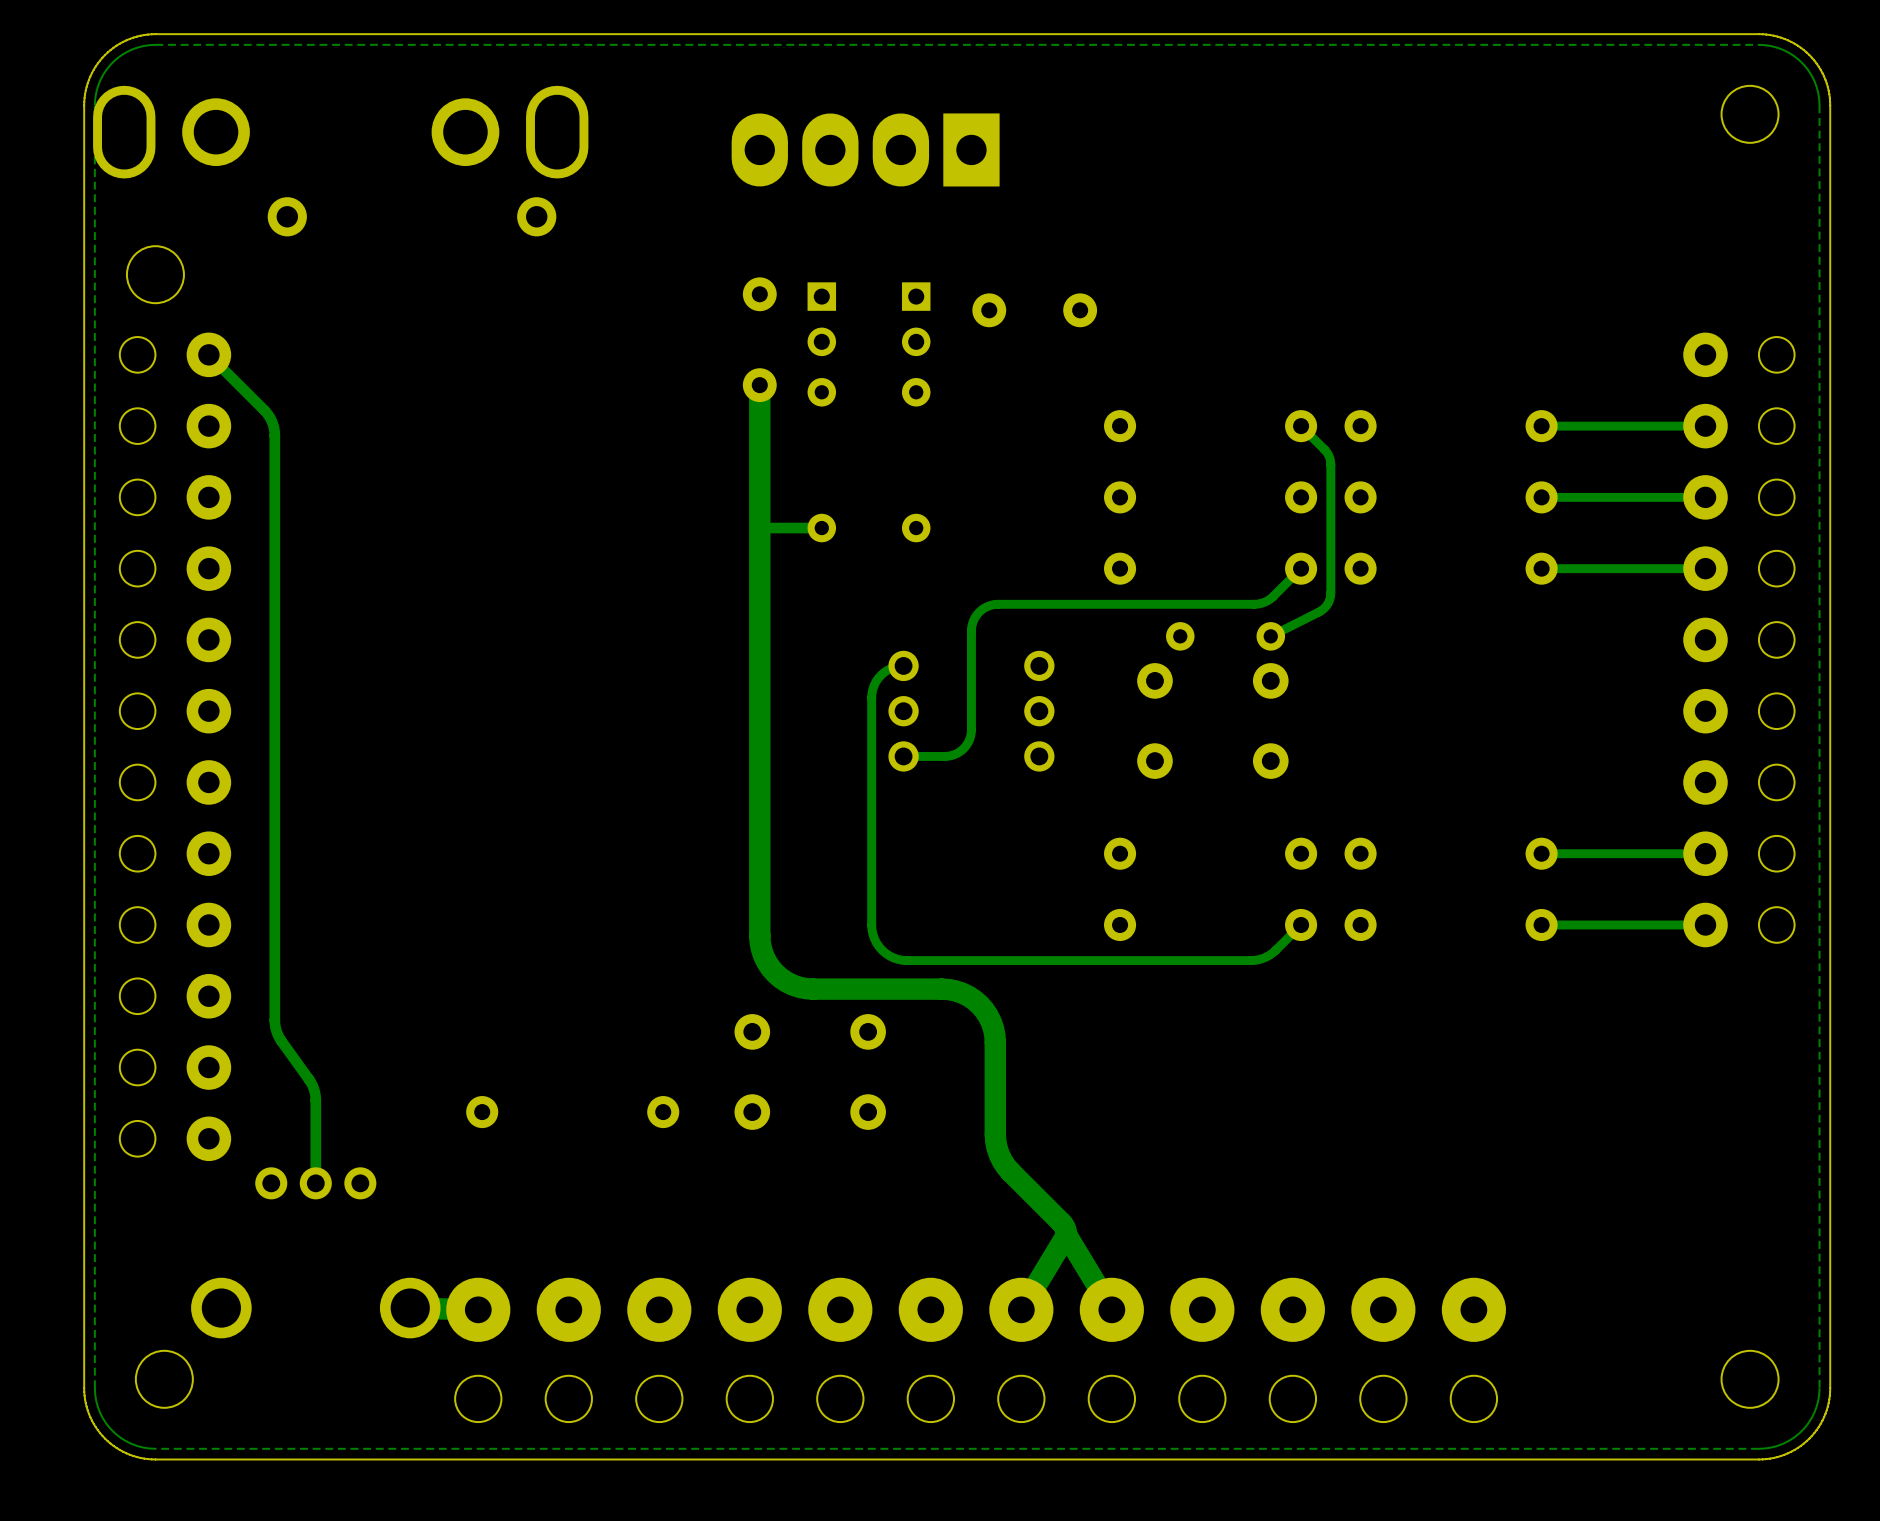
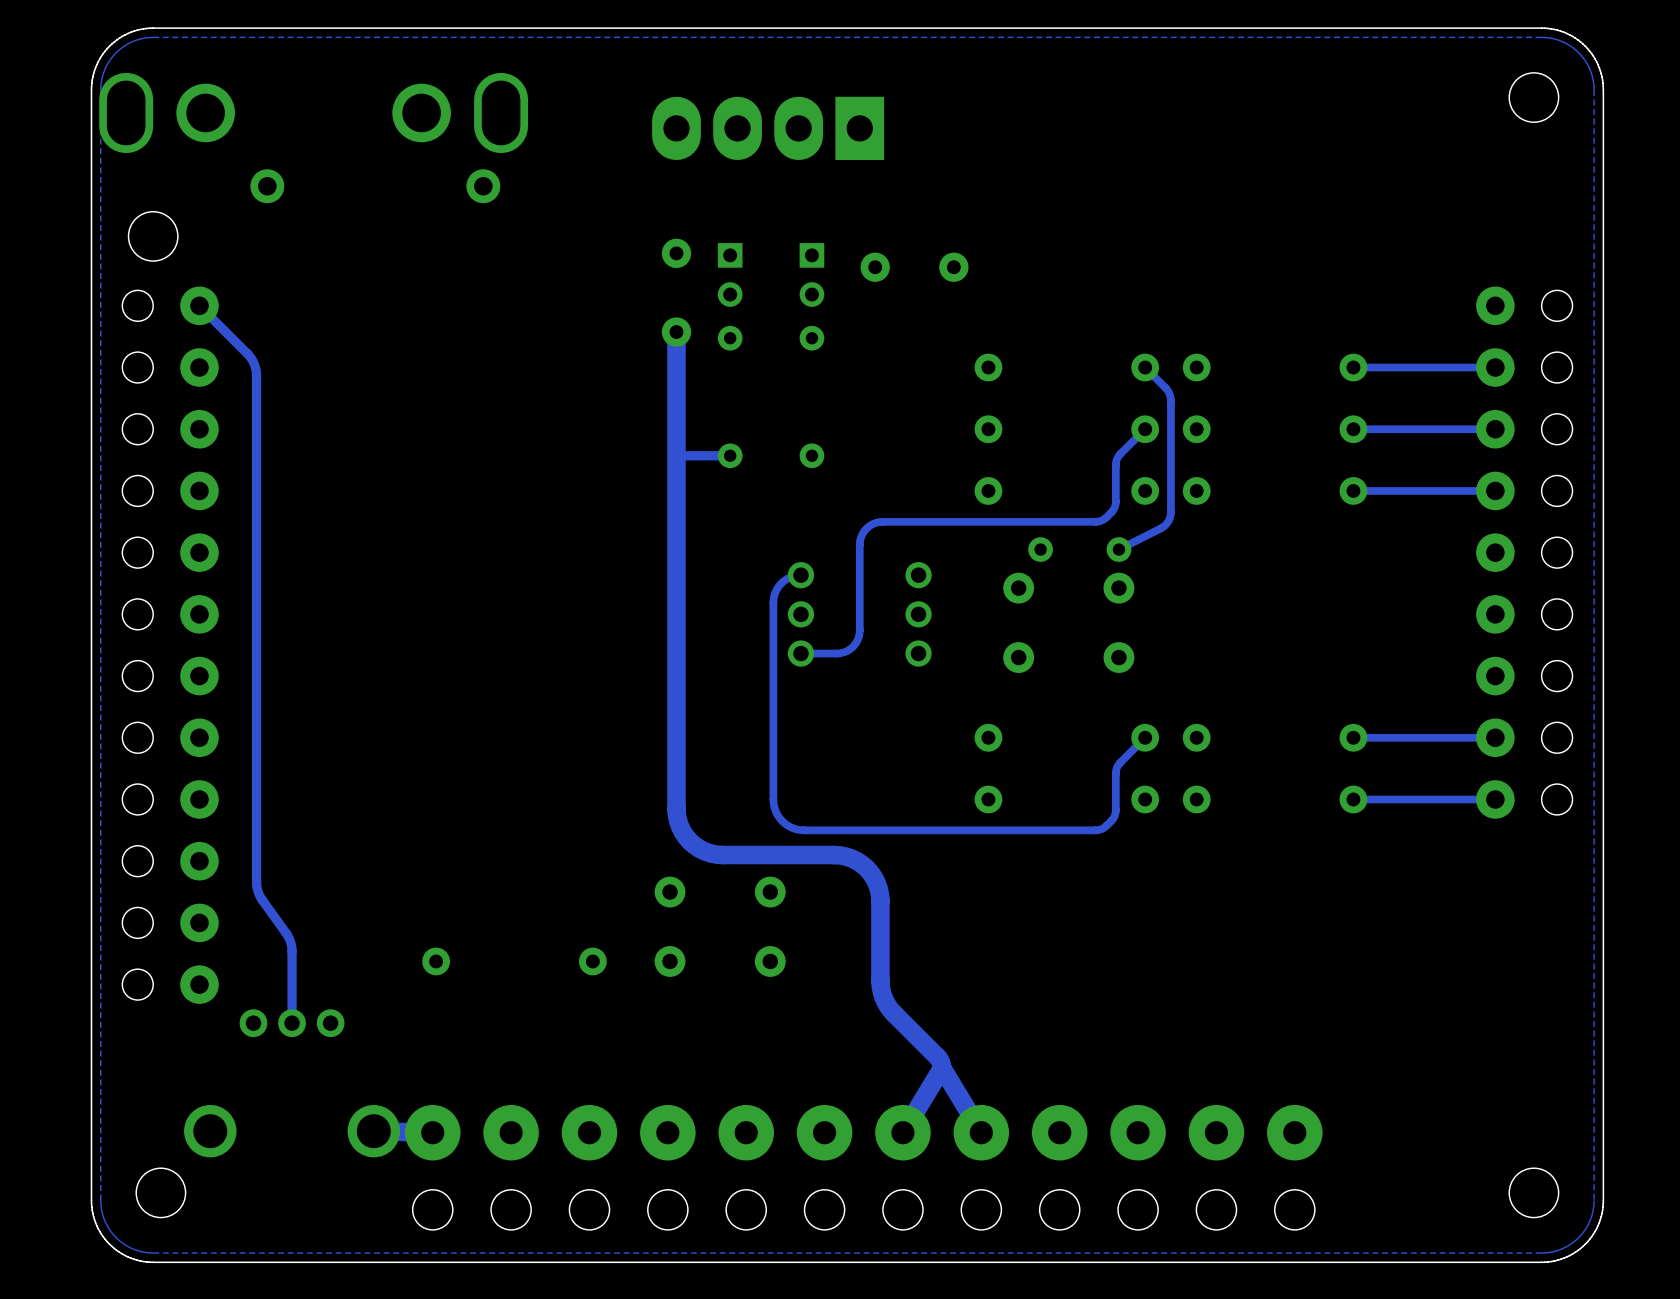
track: (1301, 568) (1267, 600) (1257, 604) (1243, 604) -> (1145, 429) (1117, 457) (1115, 506) (1105, 518) (1095, 521)
track: (1301, 924) (1270, 954) (1257, 959) (1243, 960) -> (1145, 737) (1117, 766) (1115, 814) (1105, 826) (1095, 830)

